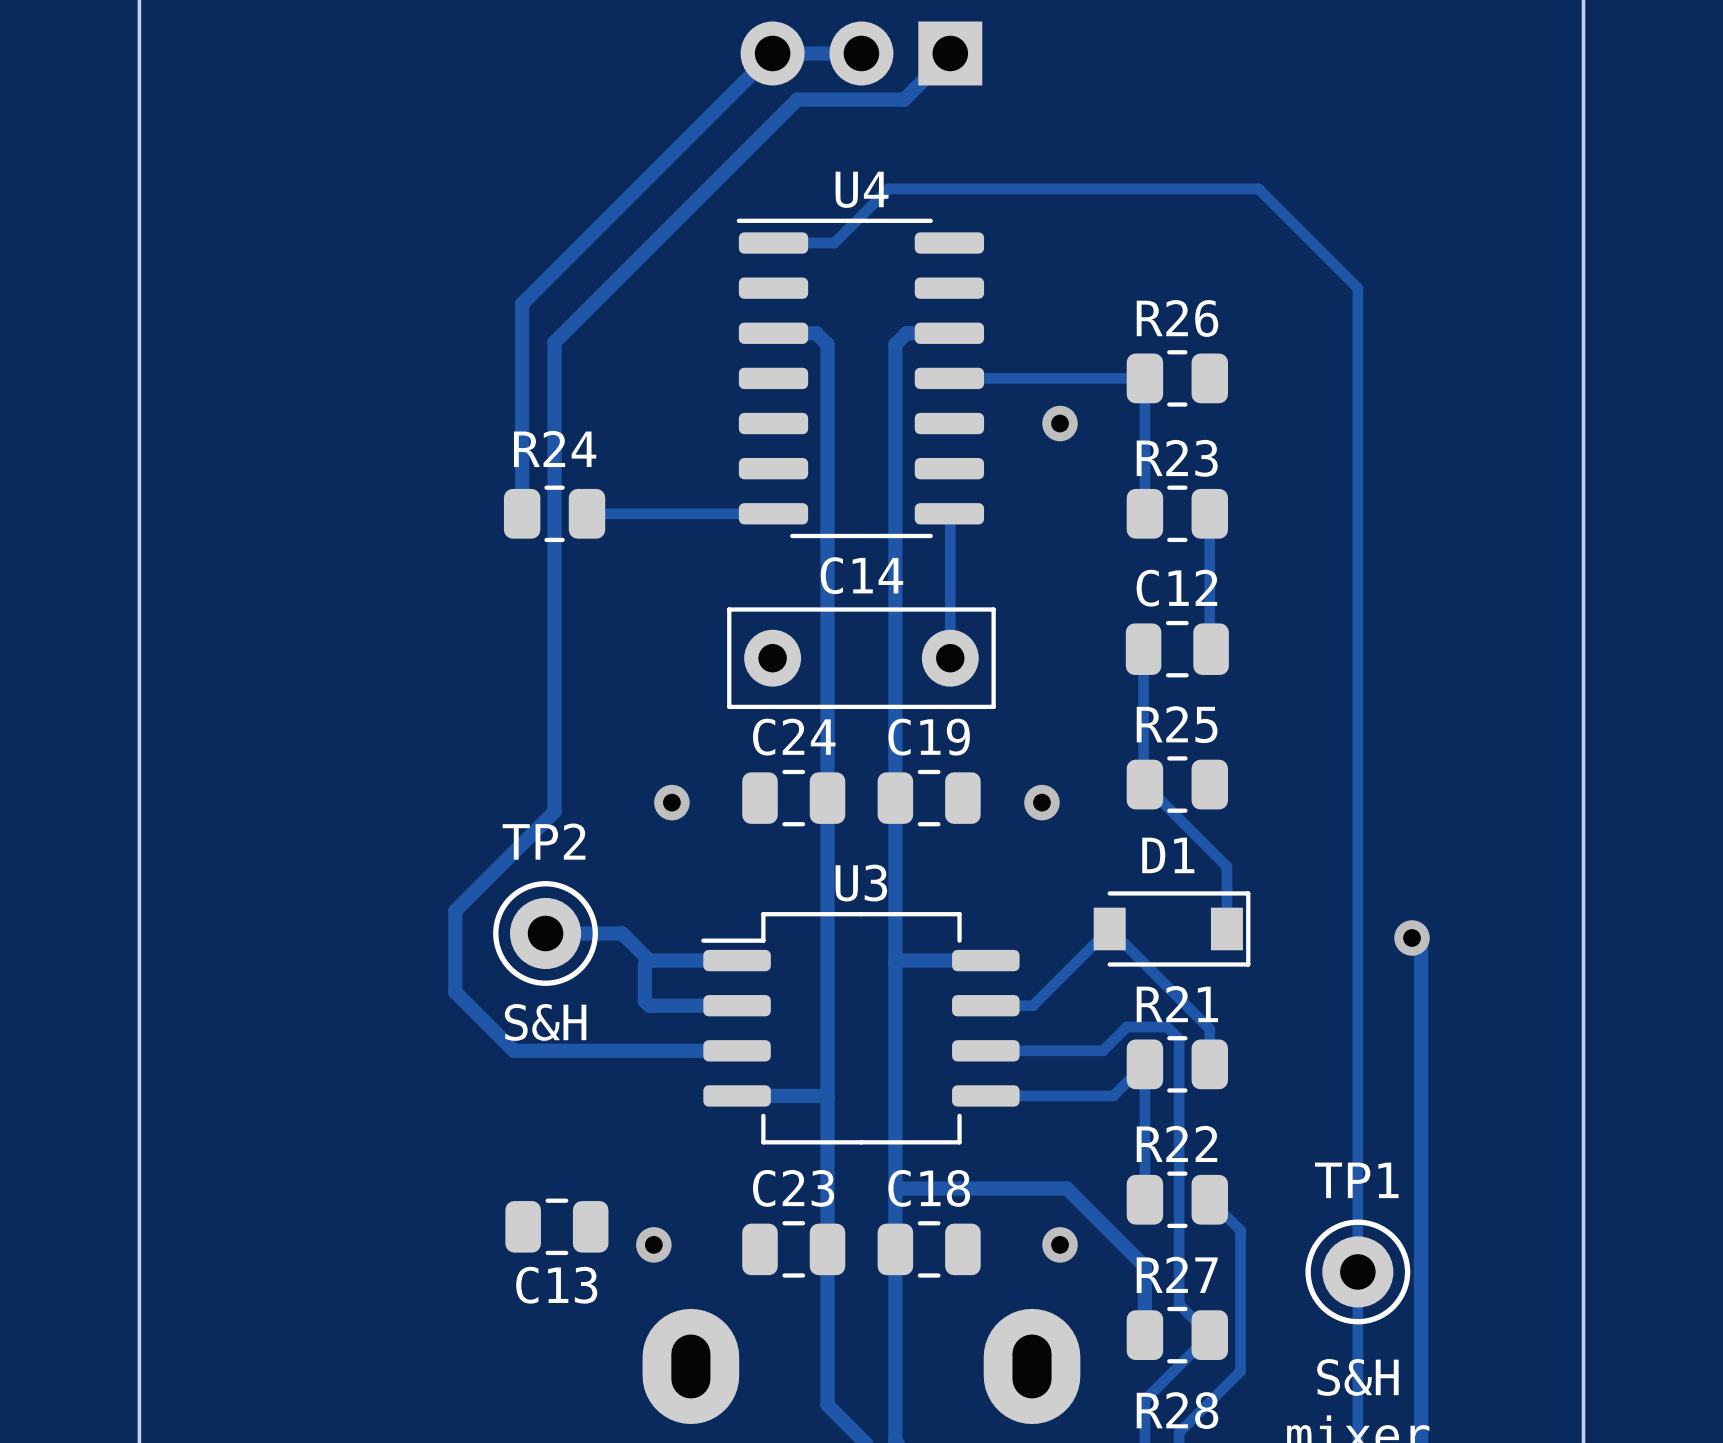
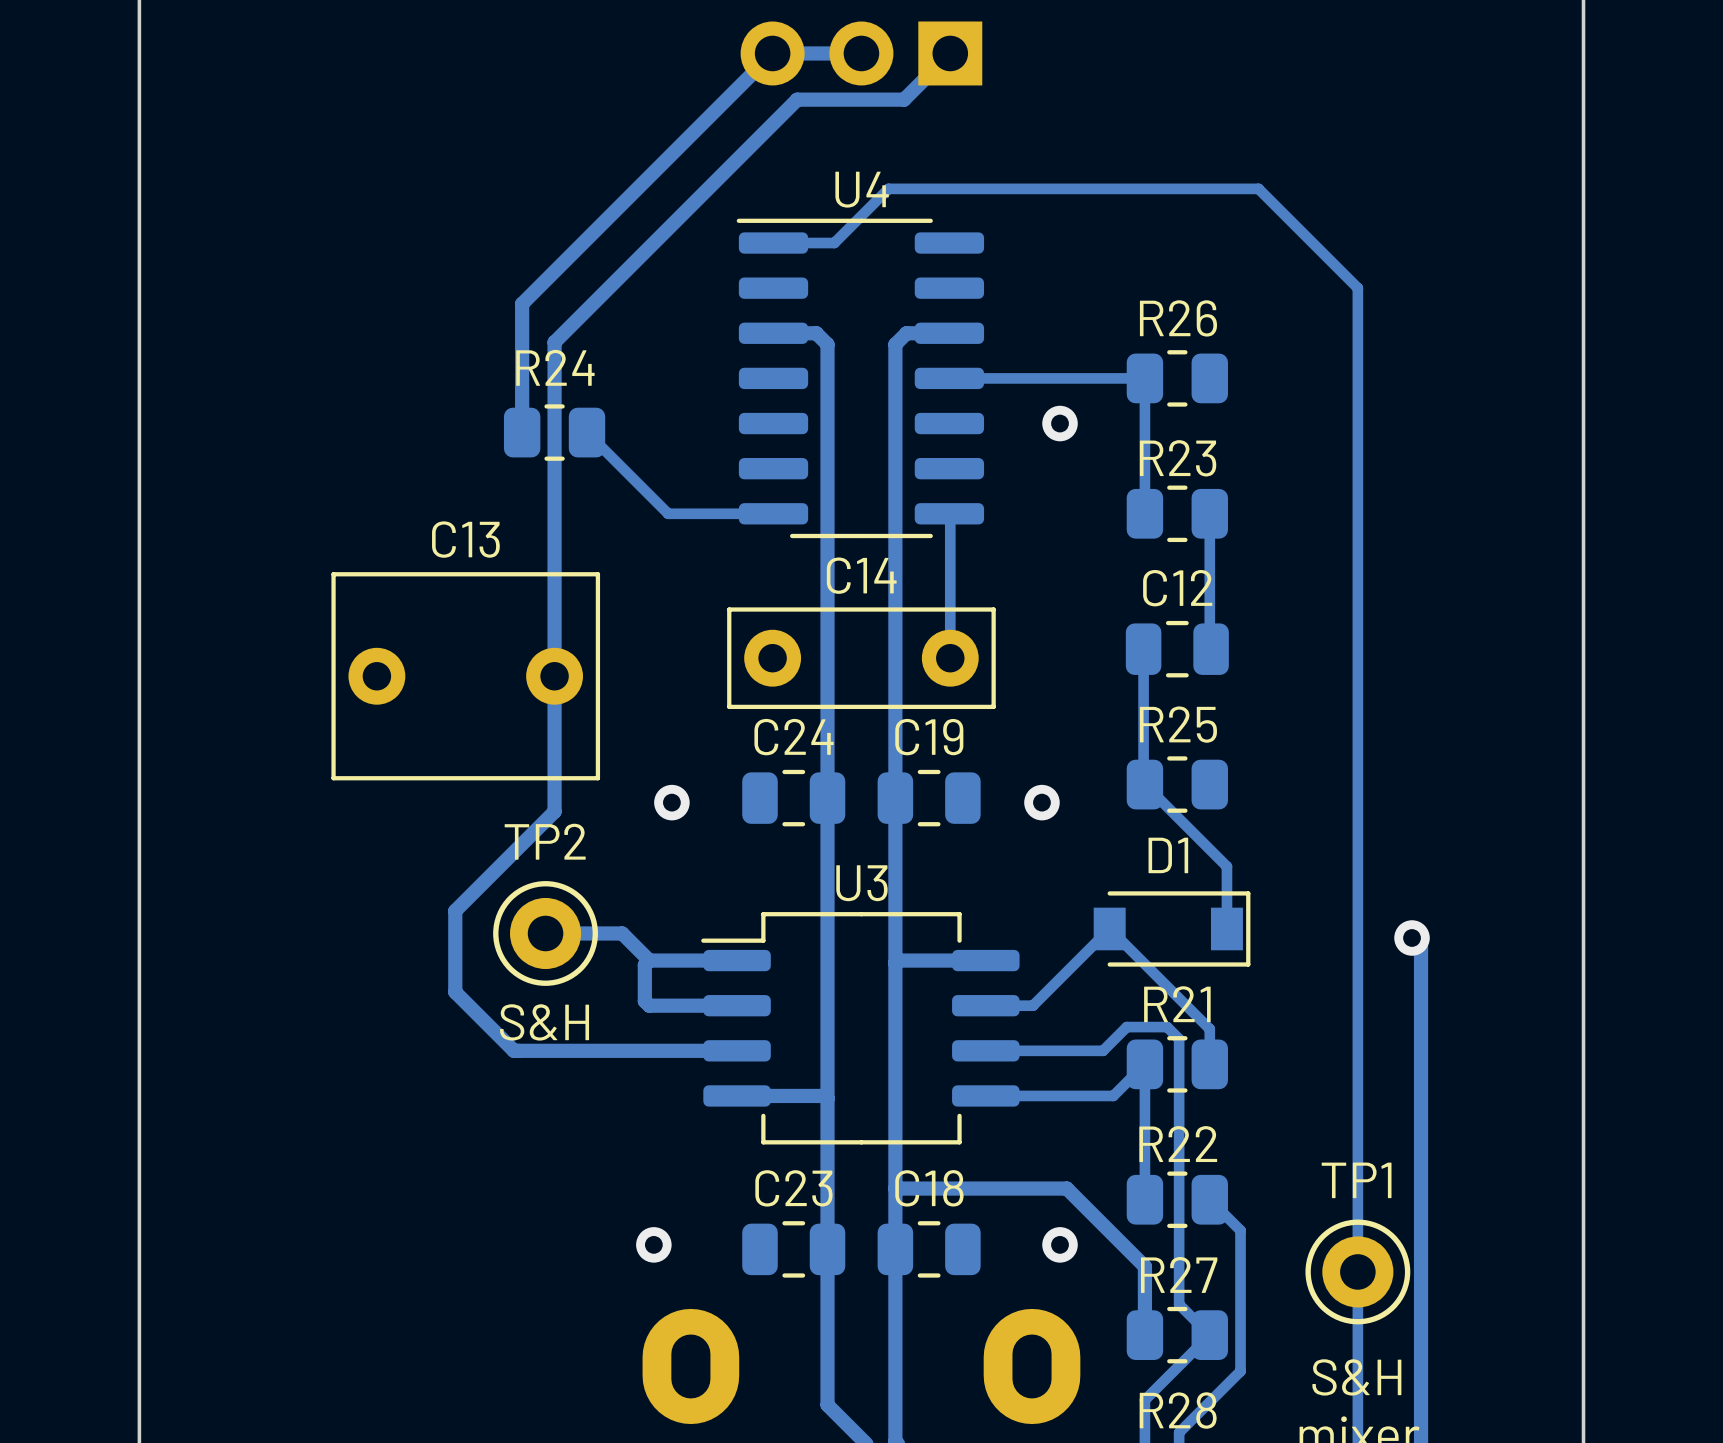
track: (522, 432) (522, 513) -> none
R24 position: (554, 513) -> (554, 432)
track: (668, 513) (587, 513) -> (668, 513) (587, 432)
C13 footprint: [505, 1198, 609, 1256] -> [331, 572, 601, 781]
C13 name position: C13 (556, 1285) -> C13 (465, 539)

